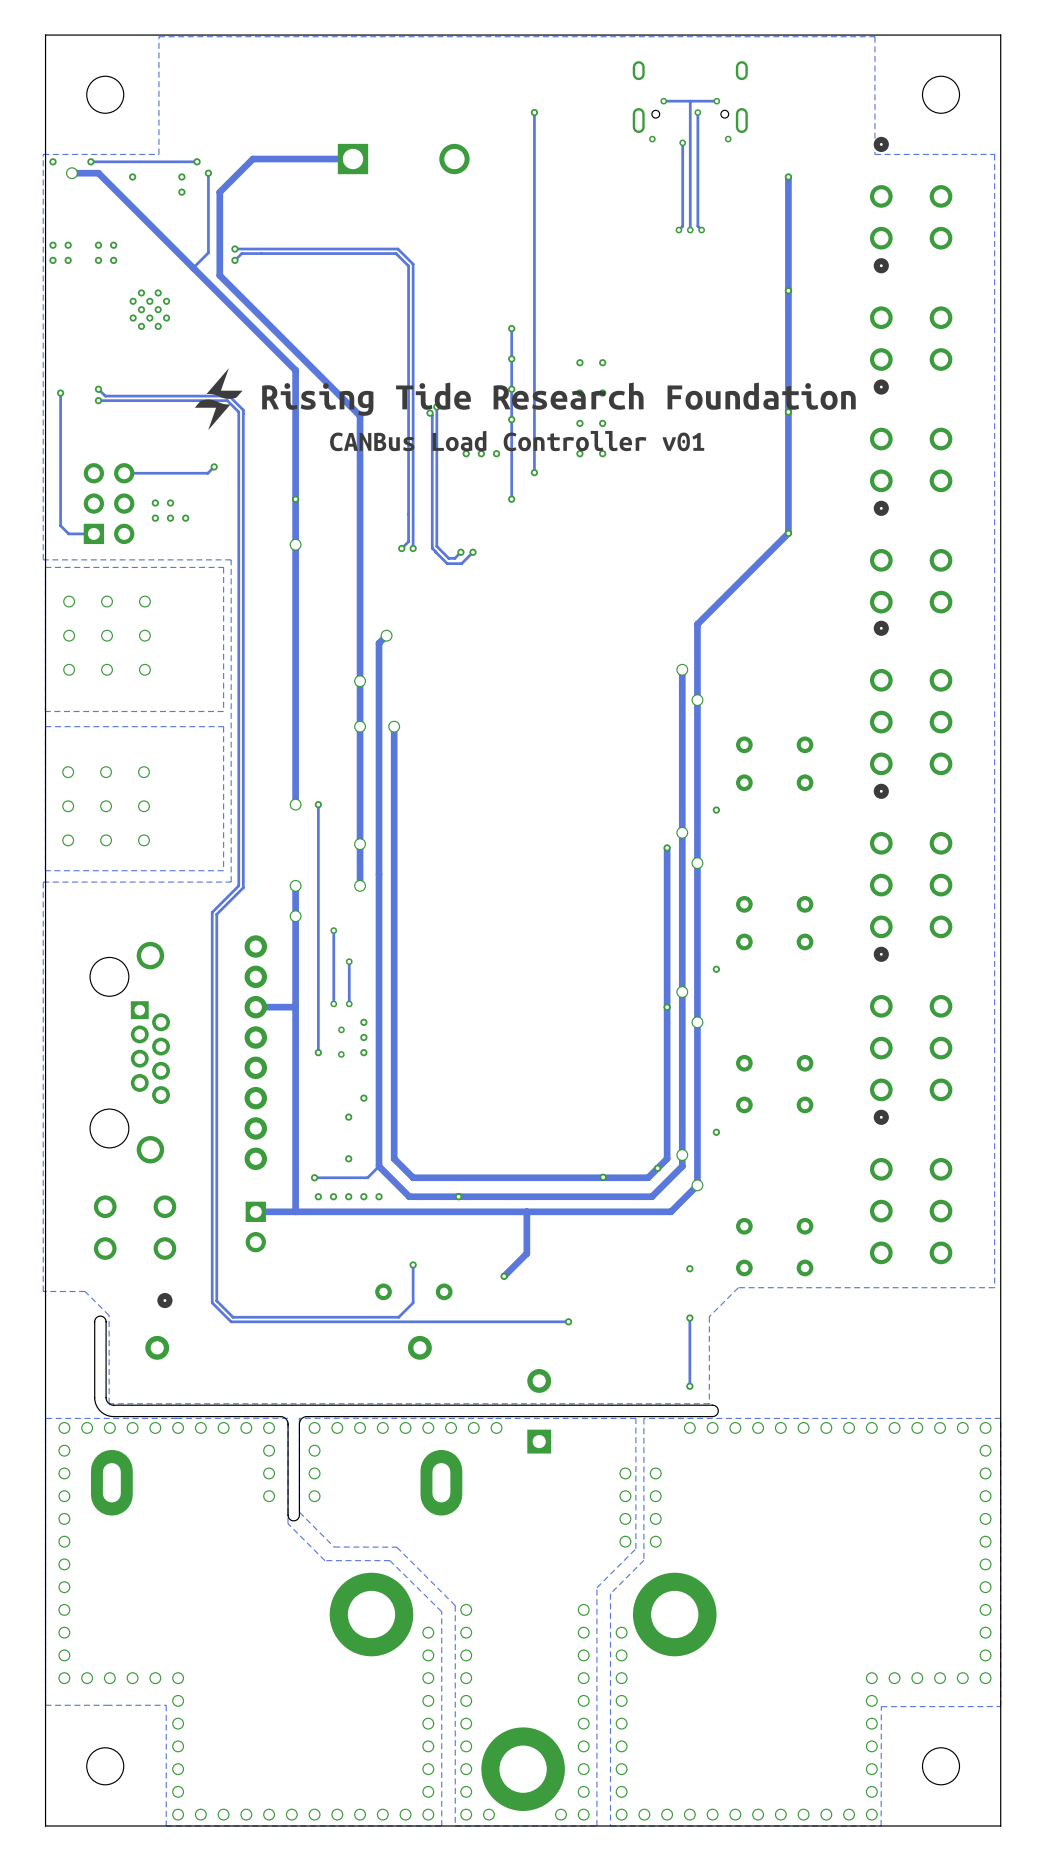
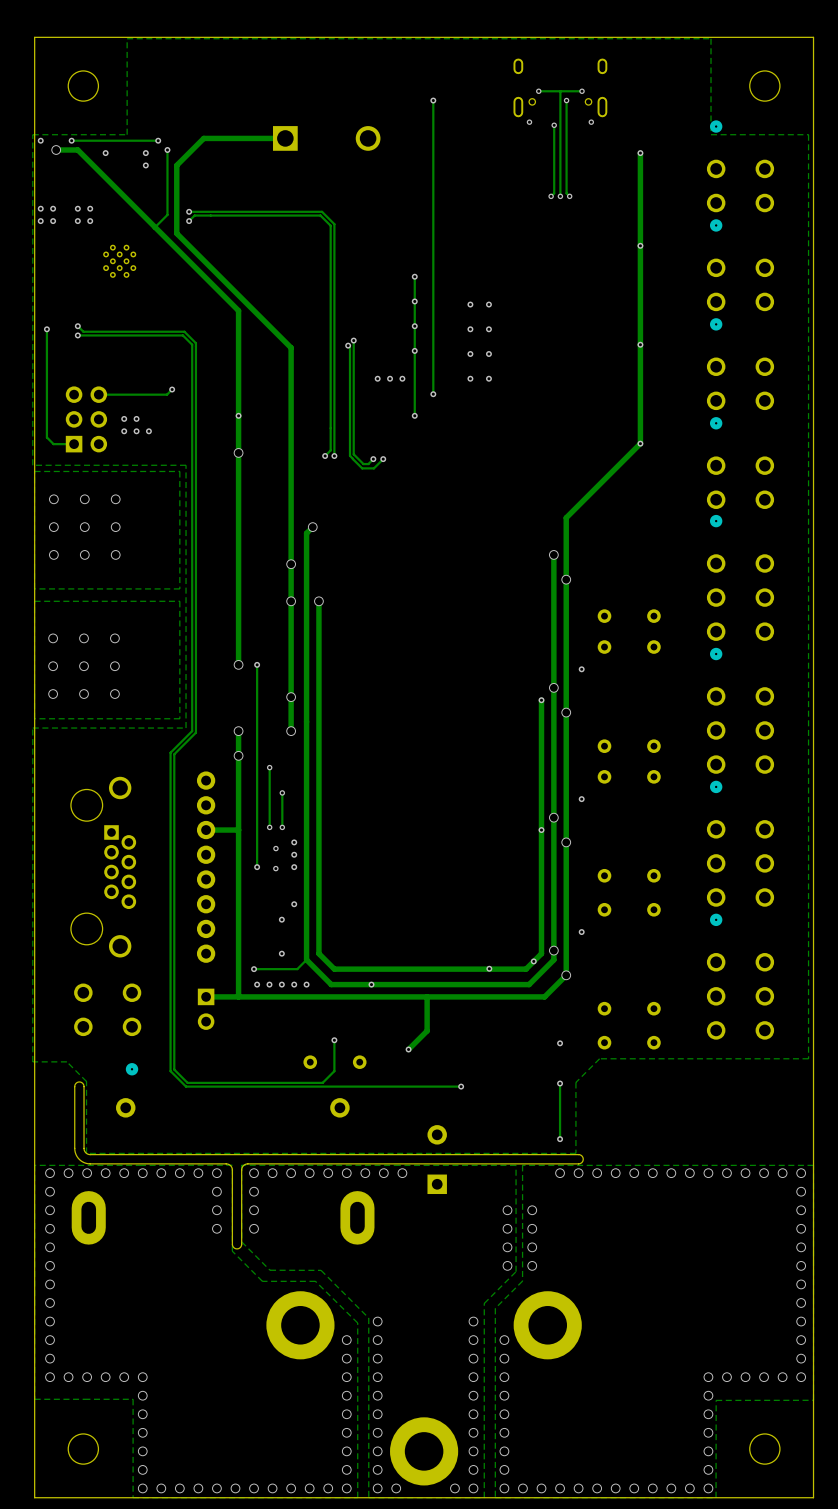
drawing: [194, 368, 243, 431] -> none
drawing: [262, 382, 856, 416] -> none
drawing: [330, 430, 705, 452] -> none

